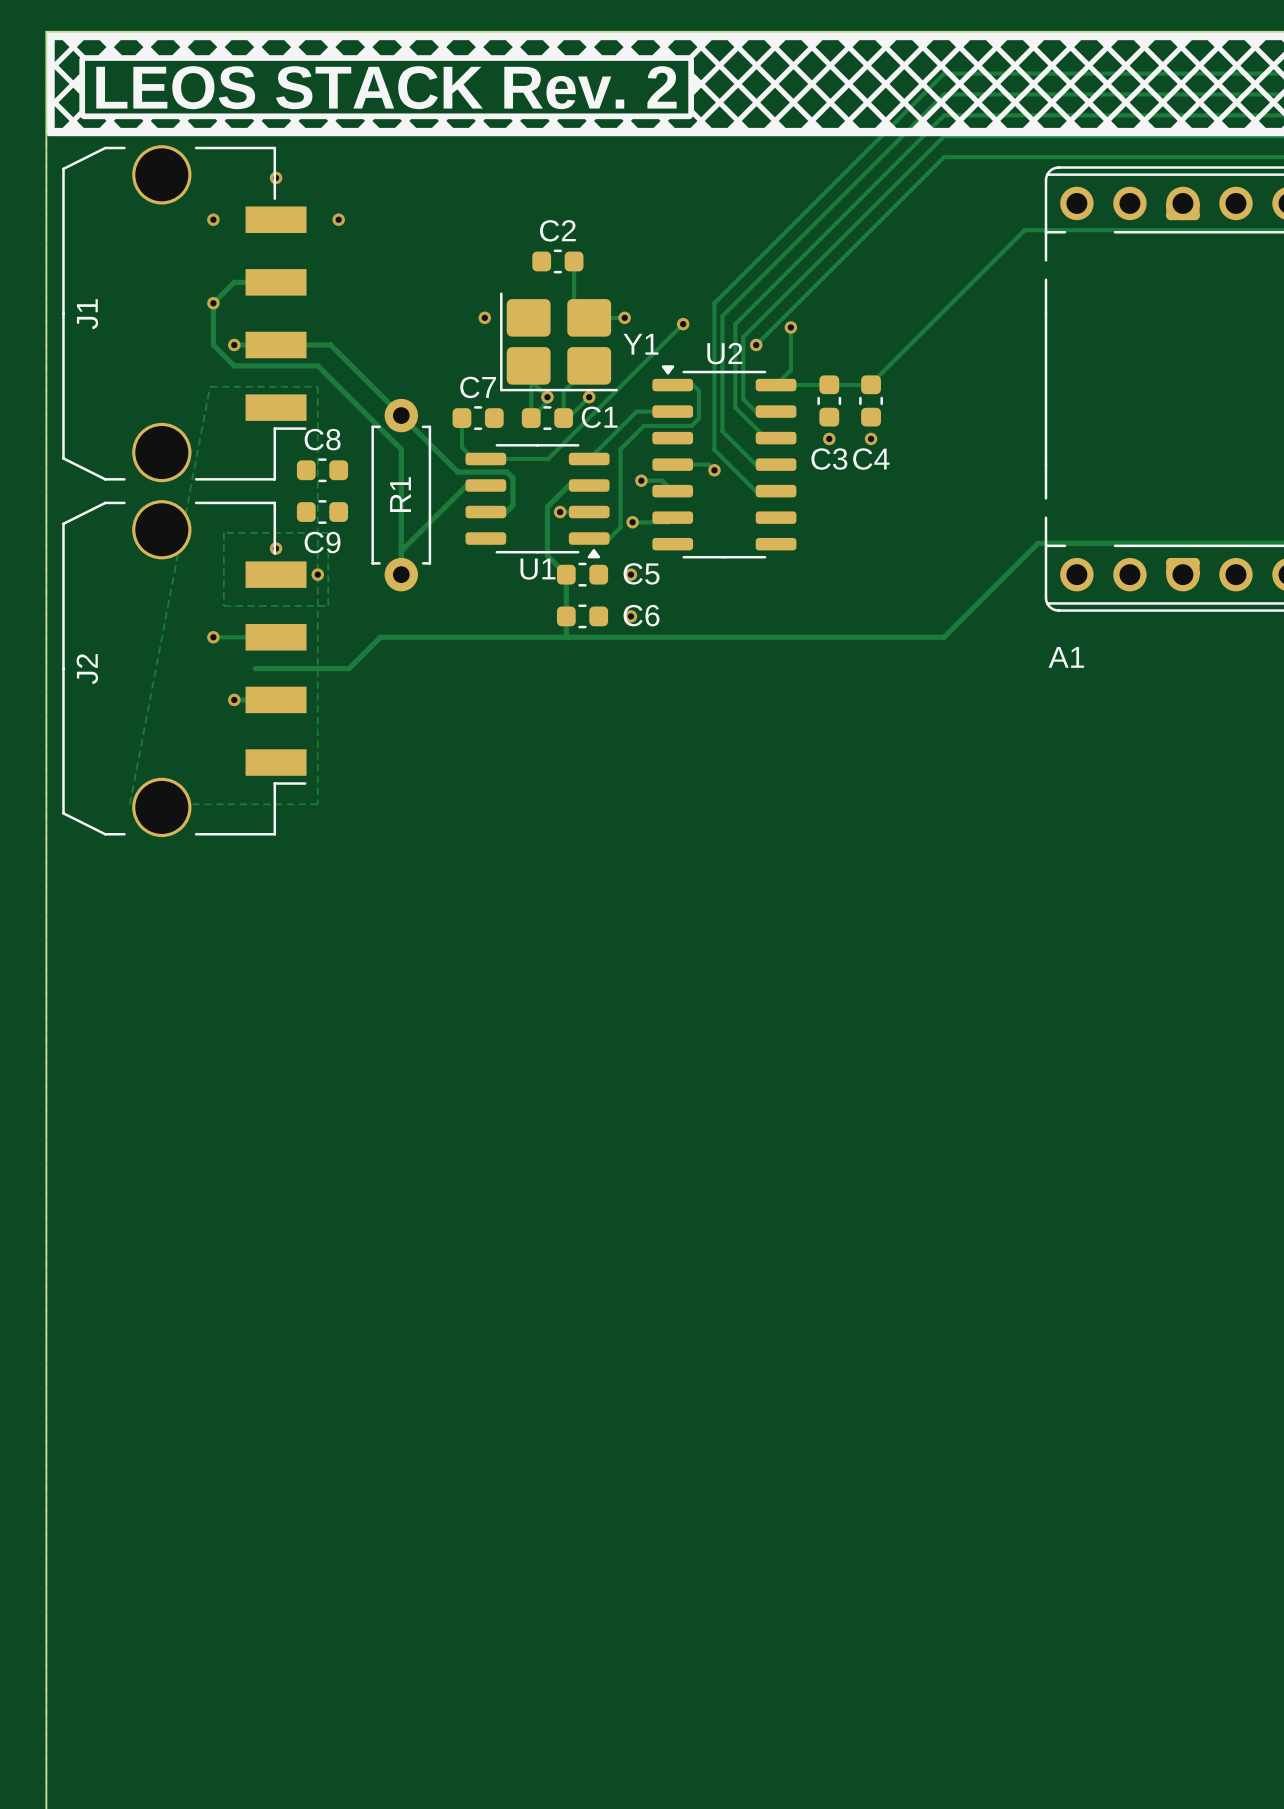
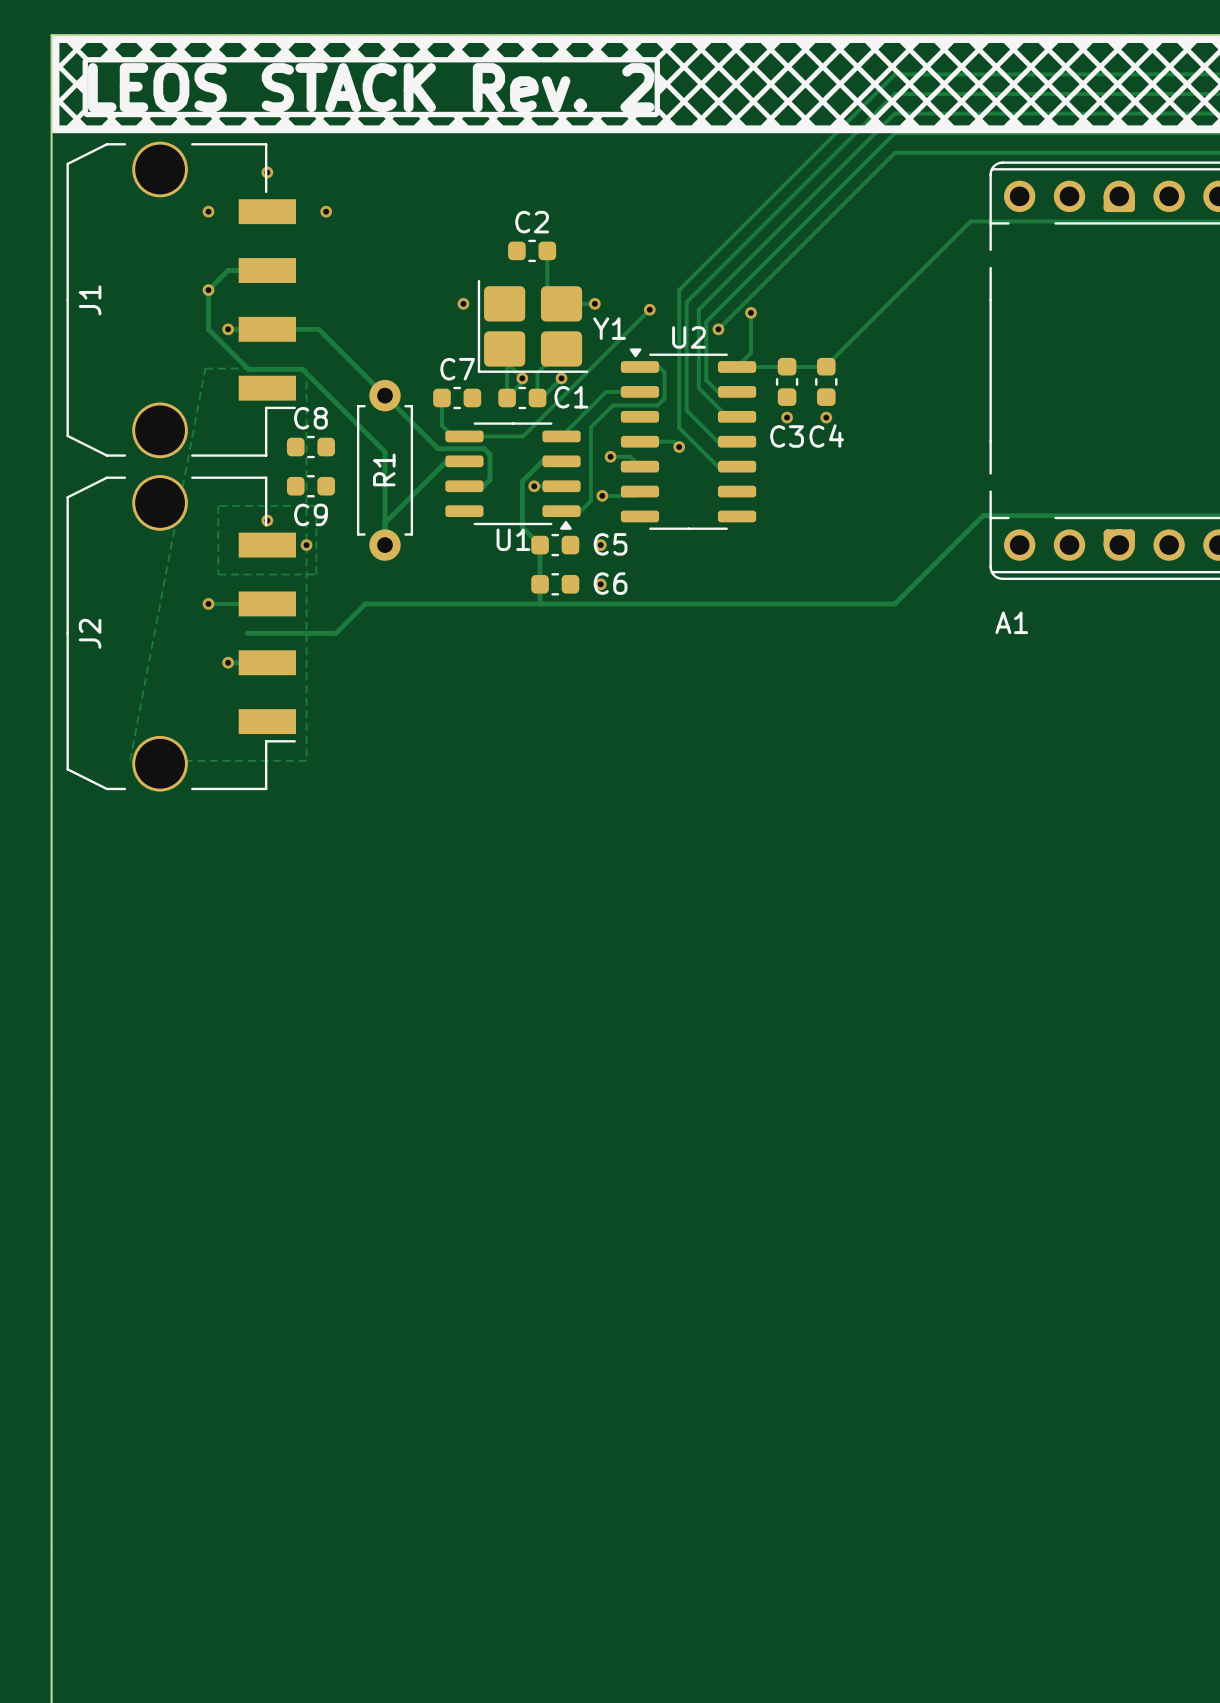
track: (234, 365) (317, 365) (401, 449) (401, 475) -> (228, 348) (248, 369) (302, 369) (385, 451)

